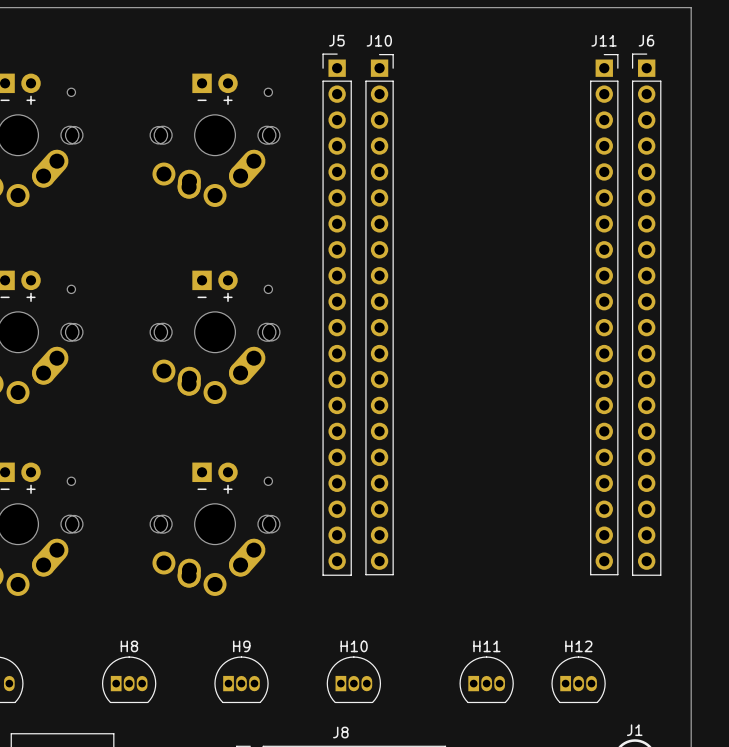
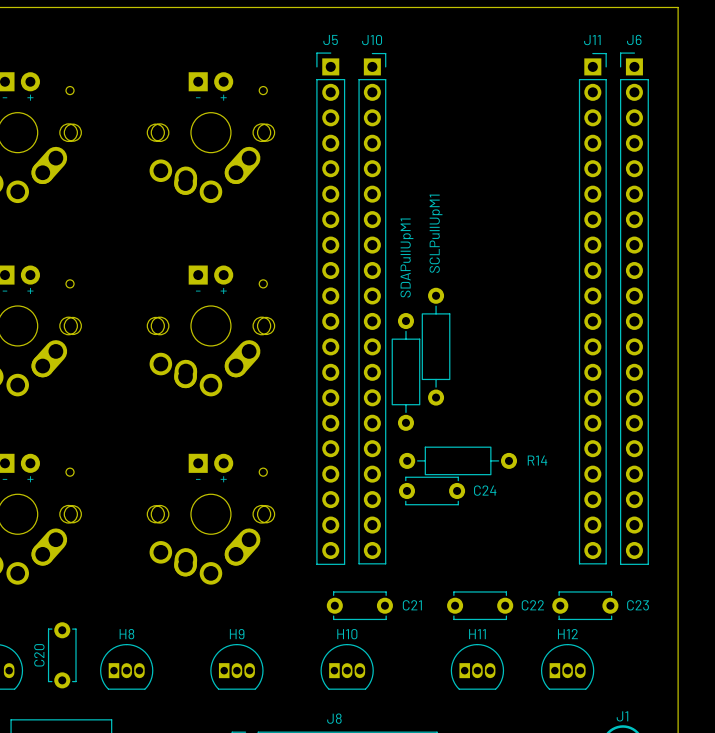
SCLPullUpM1: none -> (436, 346)
SDAPullUpM1: none -> (405, 371)
R14: none -> (458, 460)
C24: none -> (432, 490)
C21: none -> (359, 605)
C22: none -> (480, 605)
C23: none -> (585, 605)
C20: none -> (62, 655)

